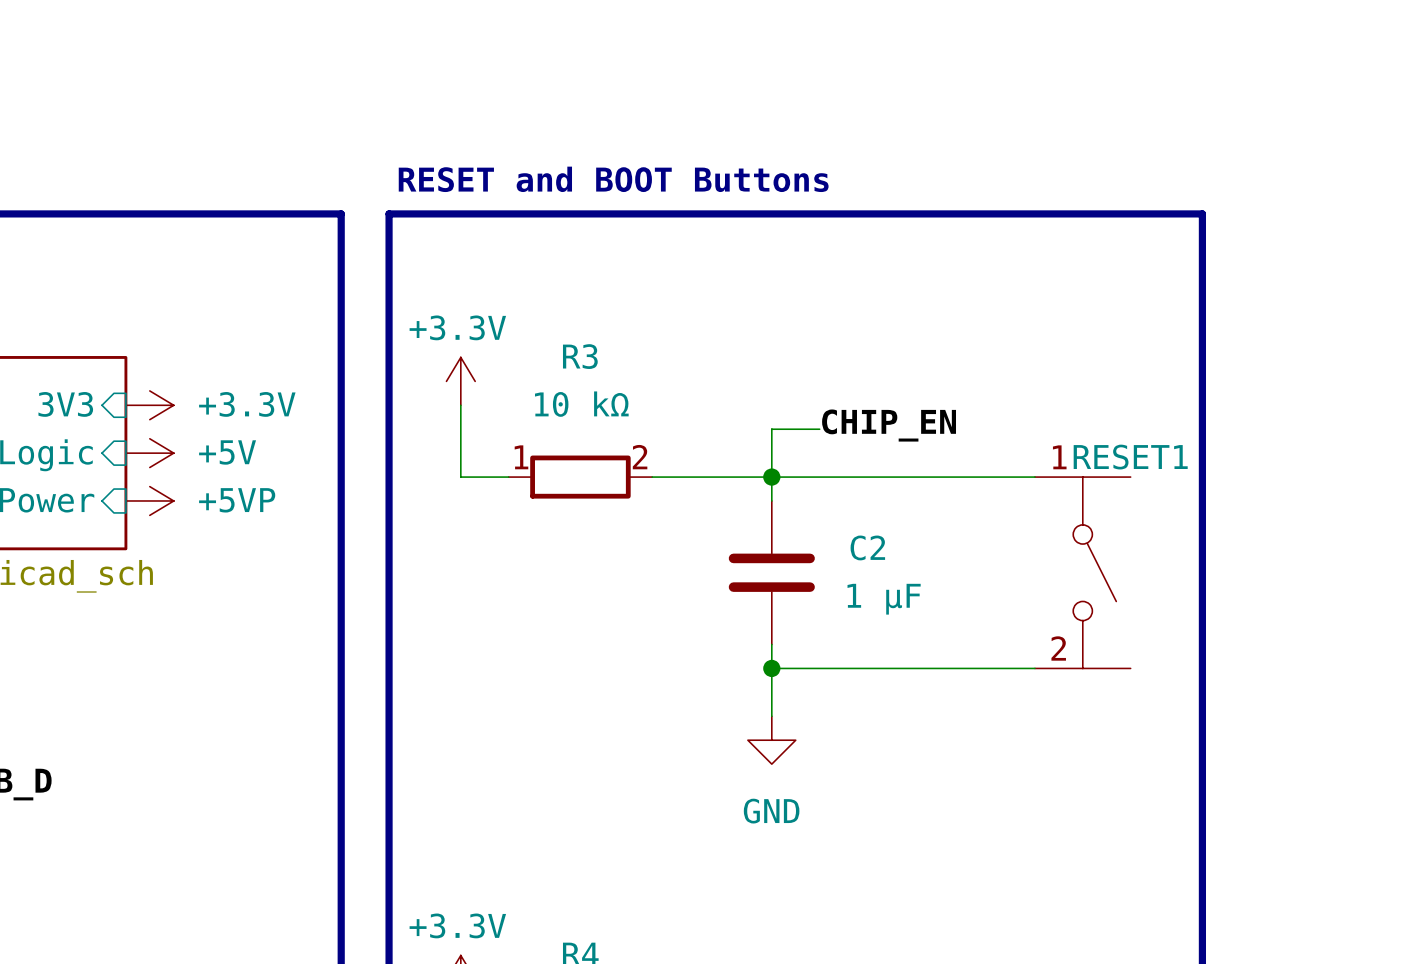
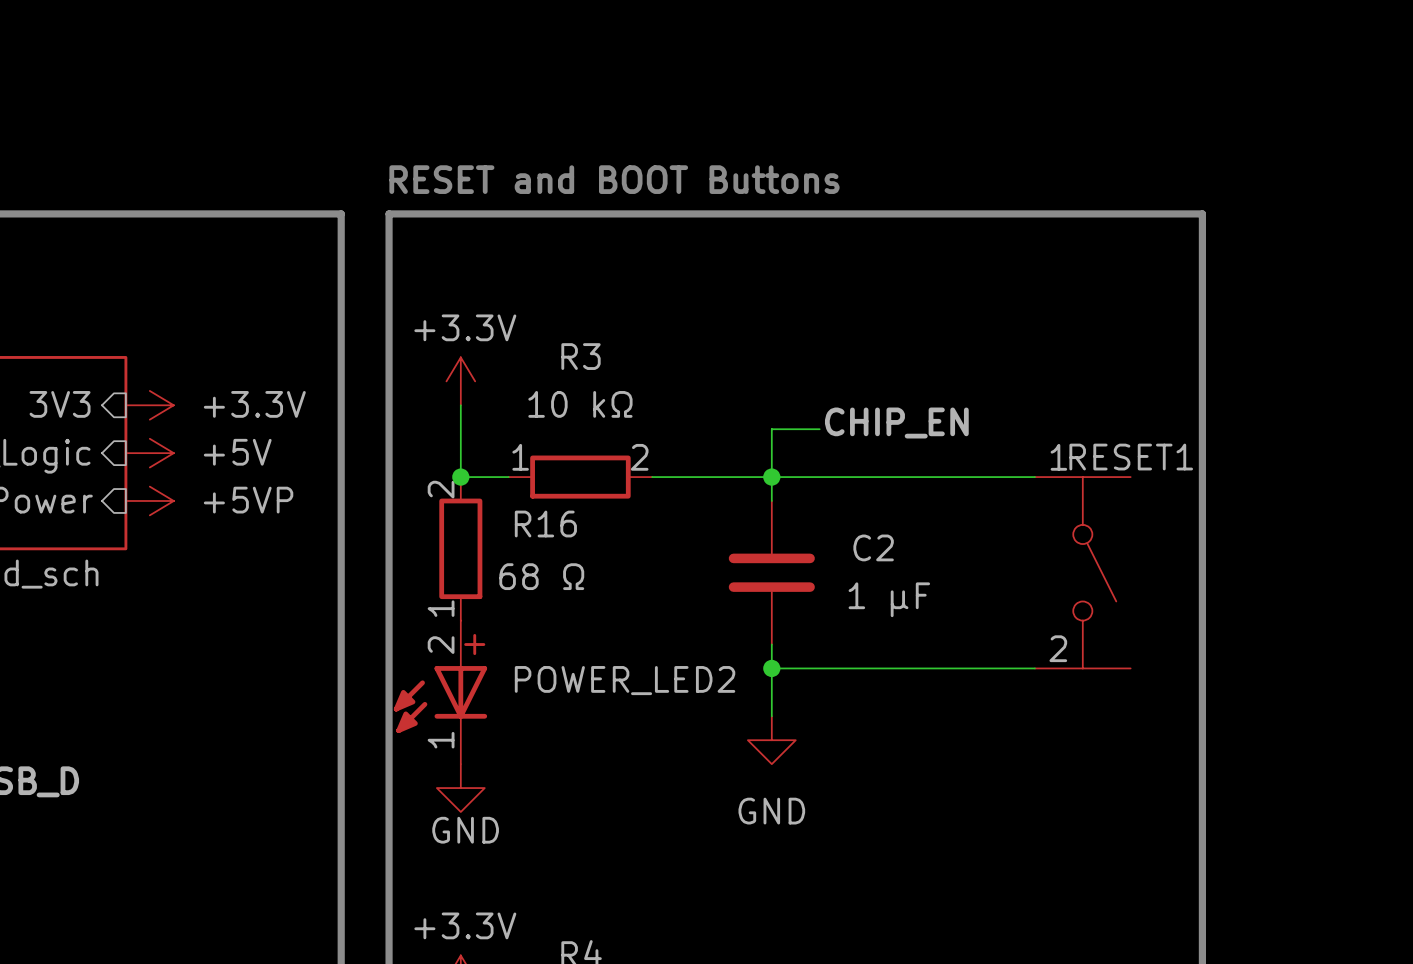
junction: none -> (460, 477)
R16: none -> (460, 548)
POWER_LED2: none -> (440, 692)
power symbol: none -> GND (460, 788)

